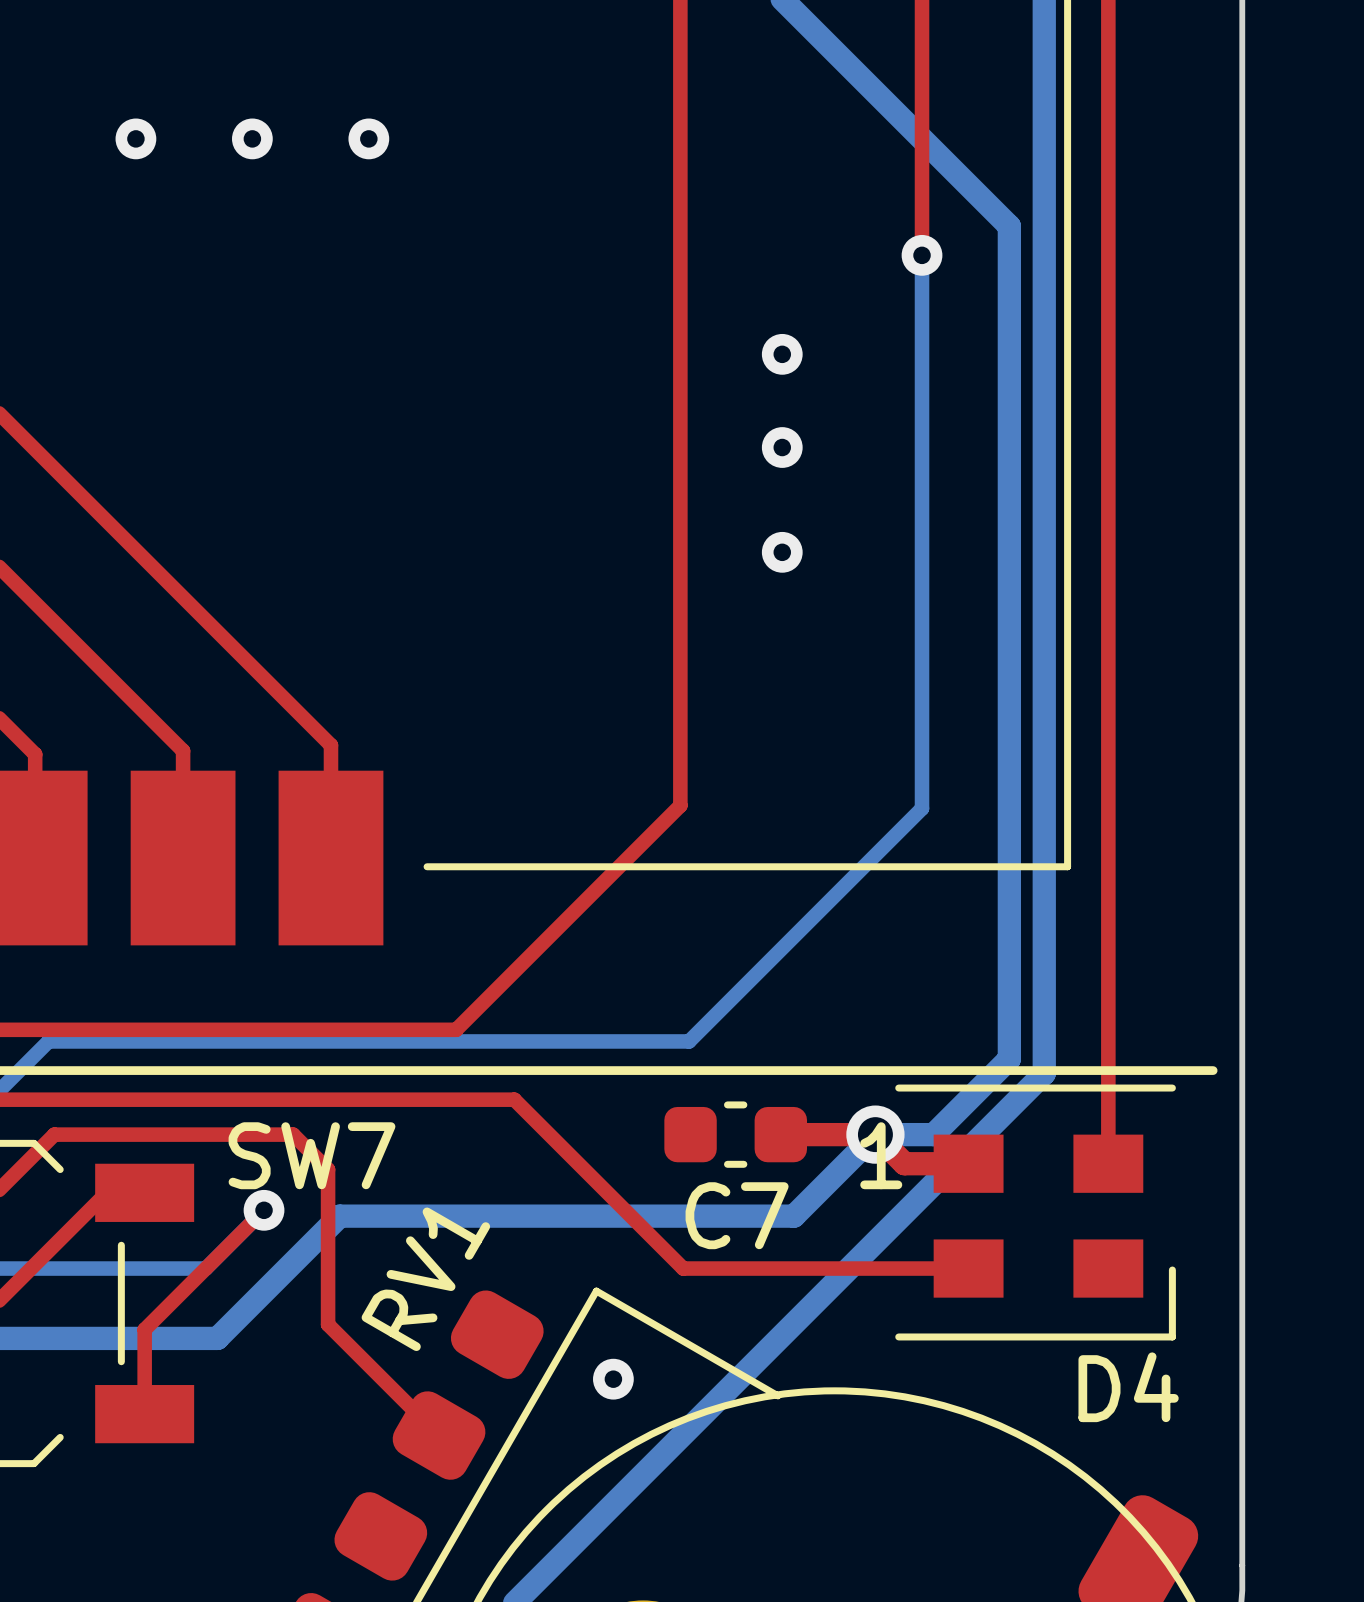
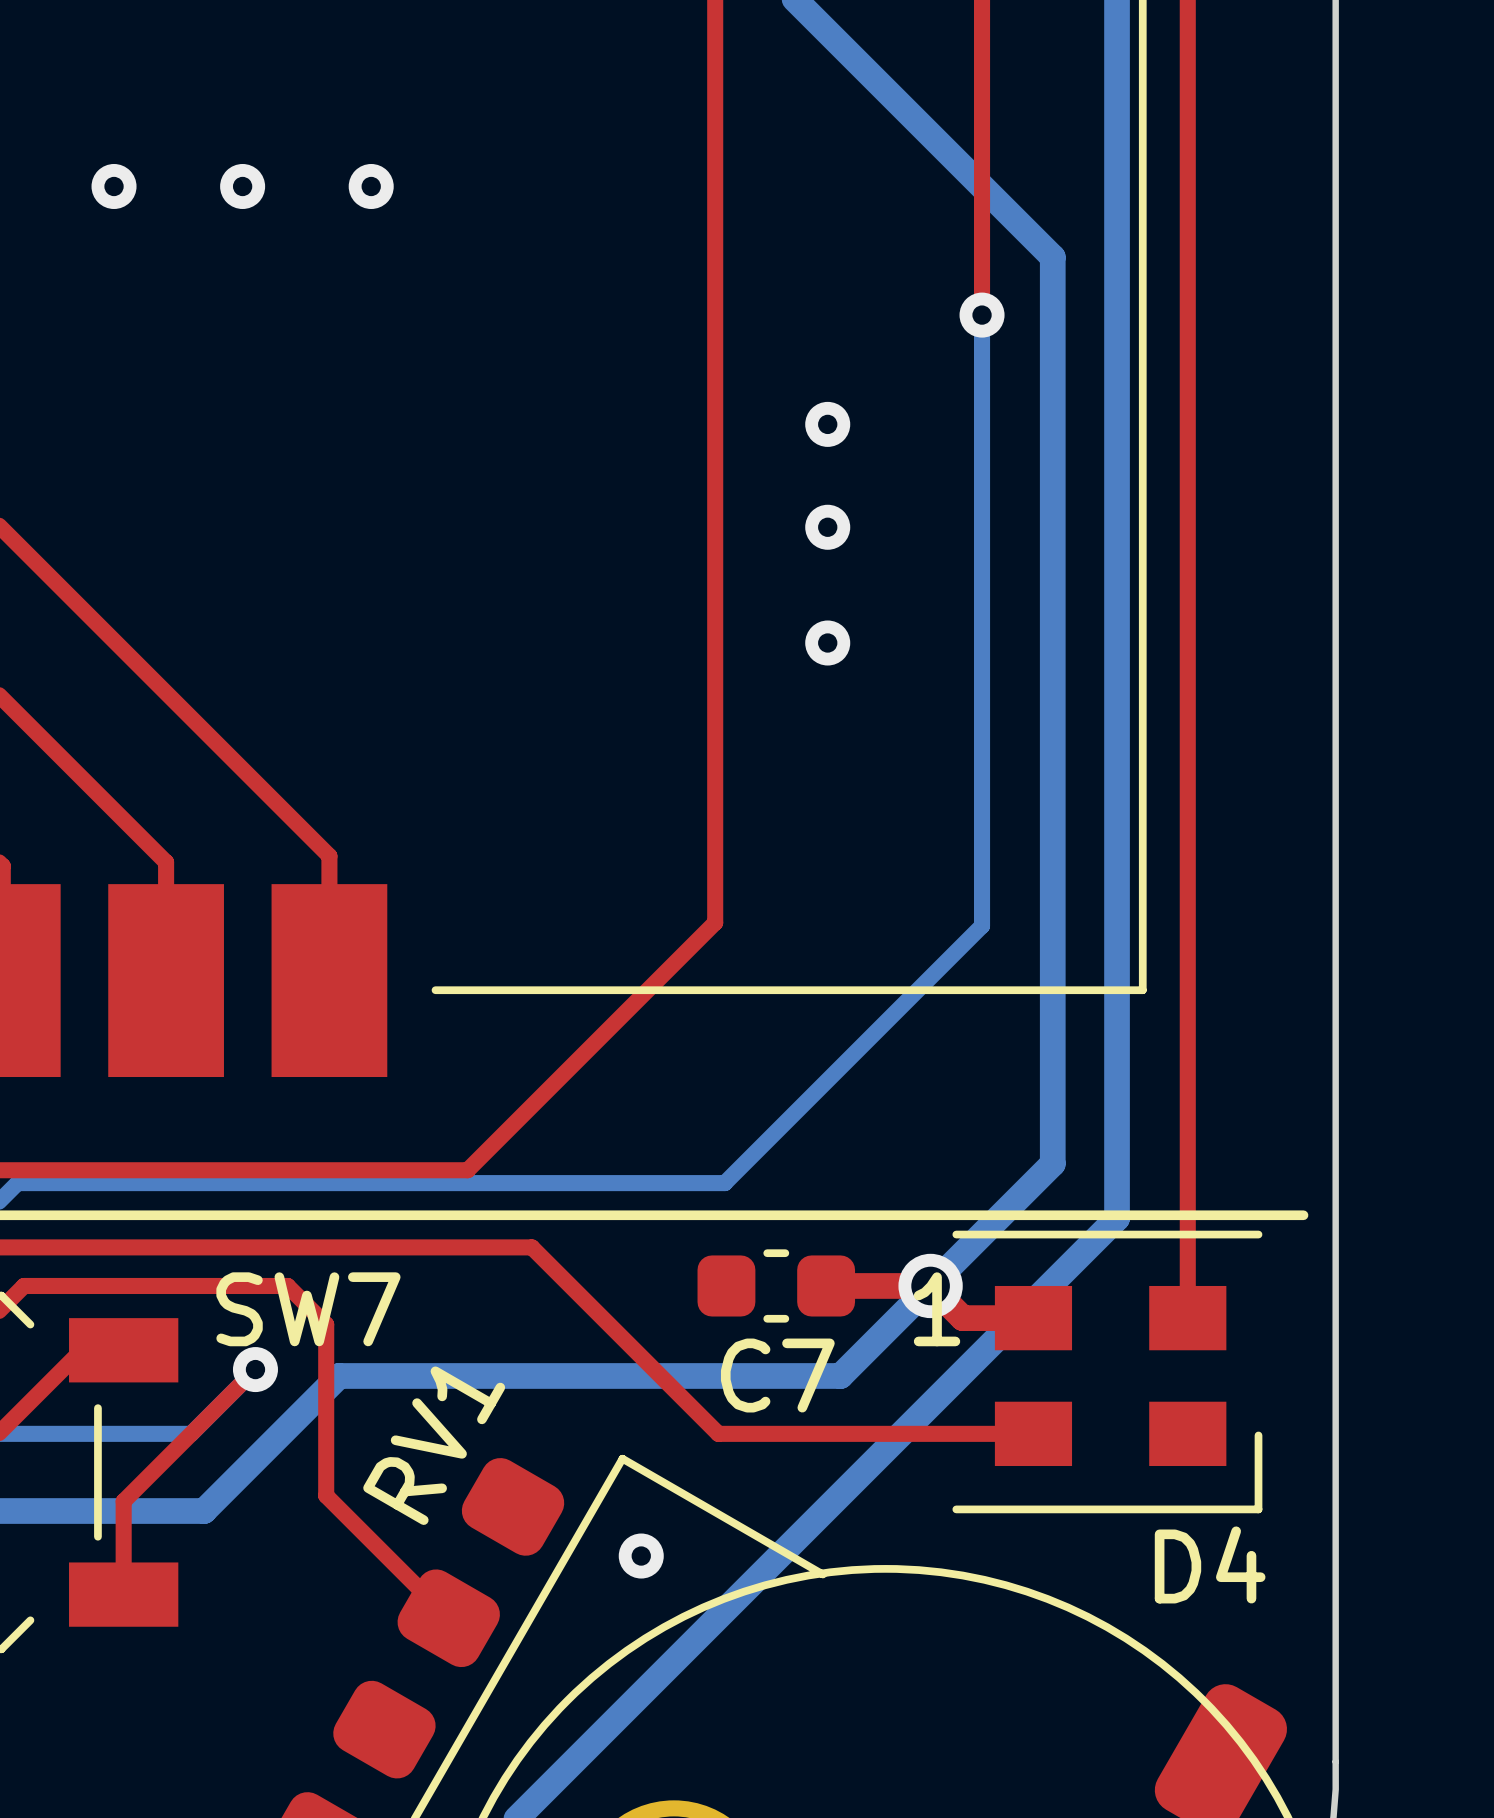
bottom track: (986, 202) (1009, 226) (1009, 1058) (933, 1134) (875, 1134) -> (1052, 257) (1052, 1163) (930, 1285)

